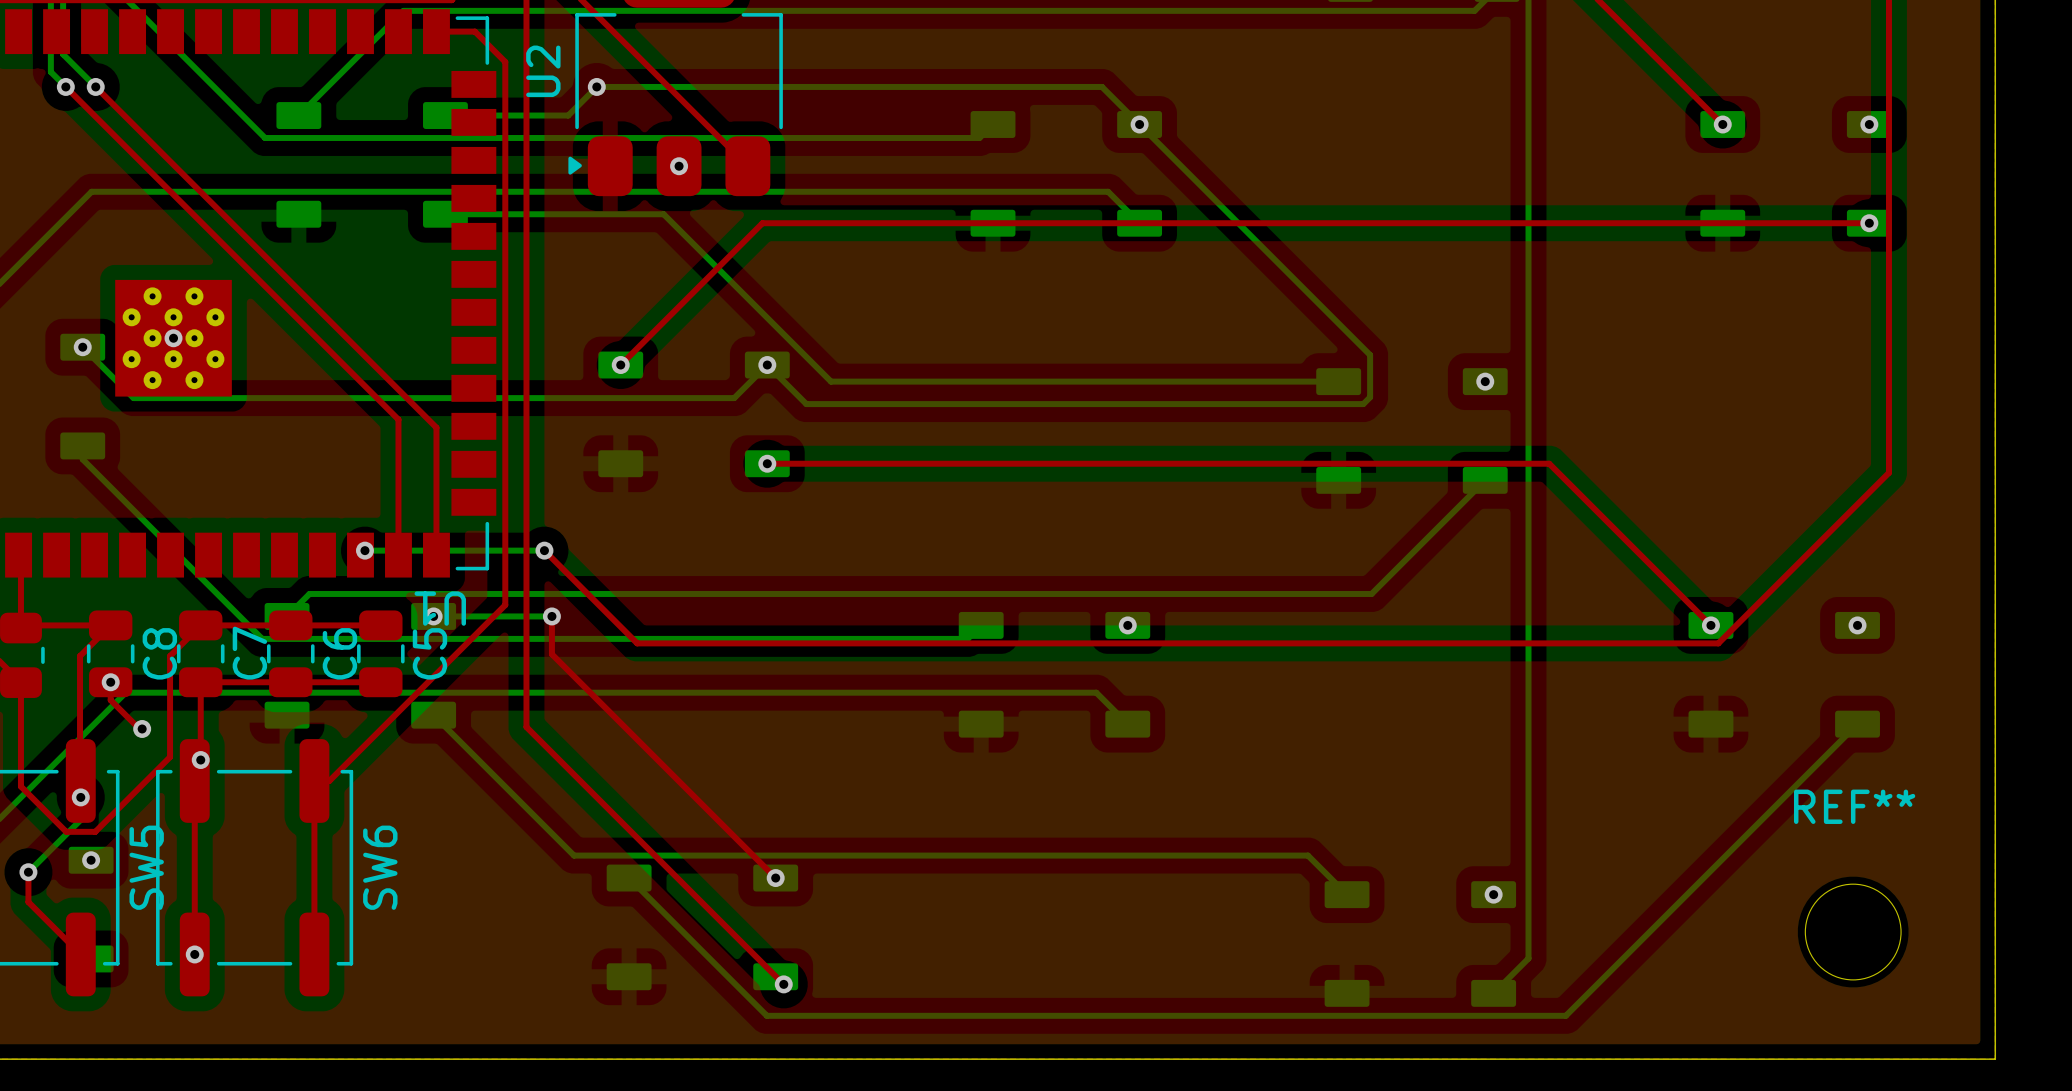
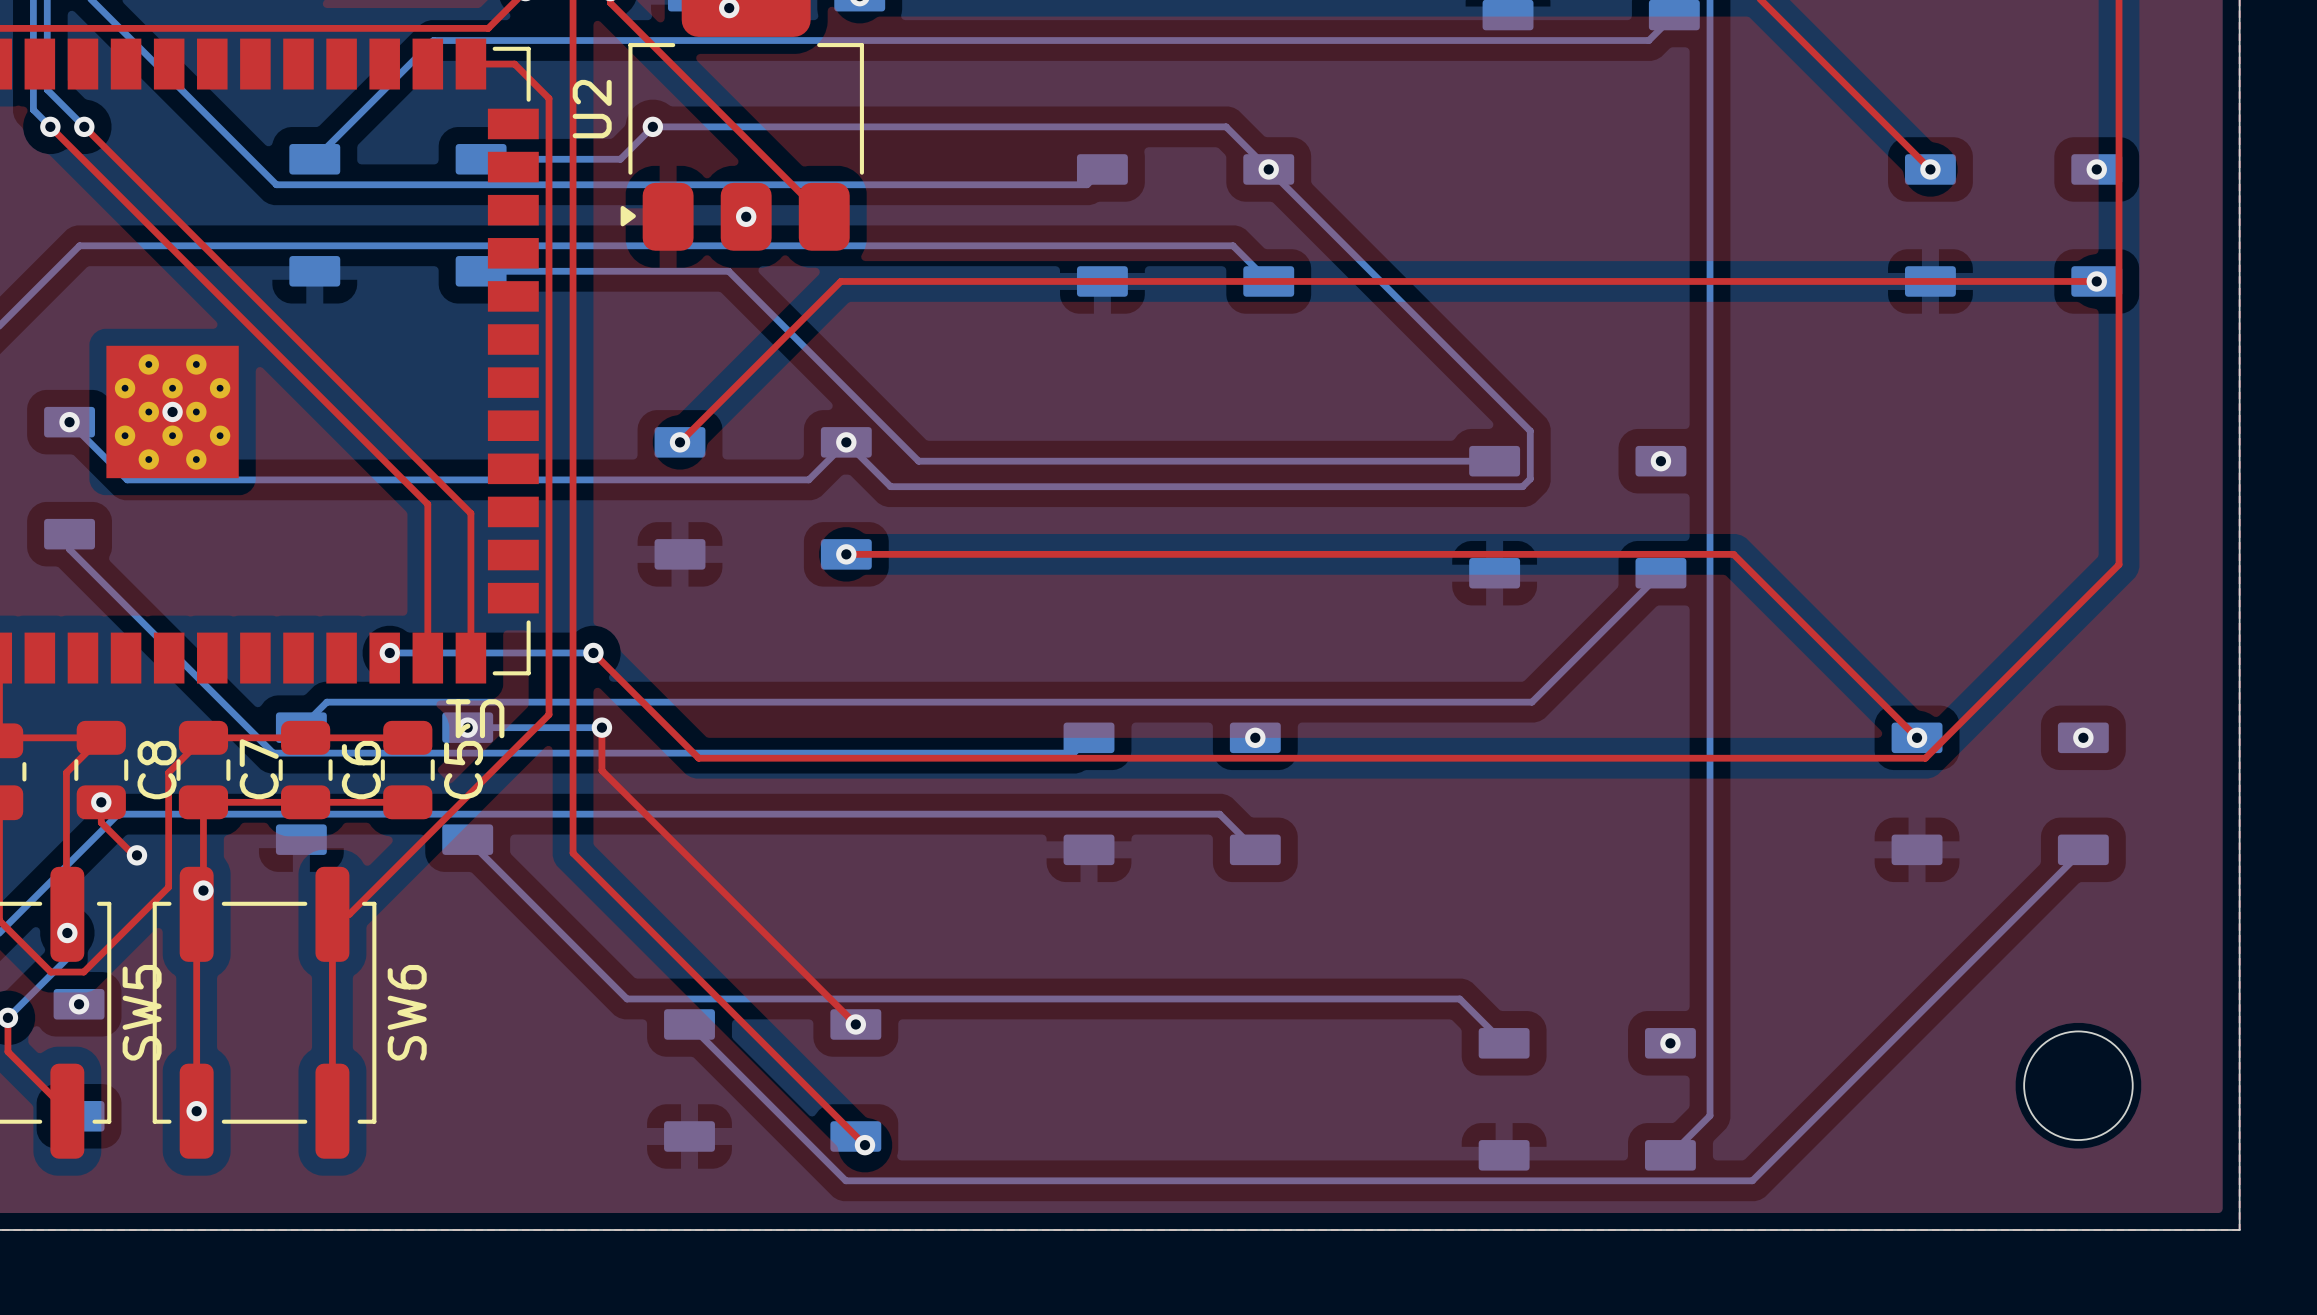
REF** name: REF** (1854, 806) -> none

